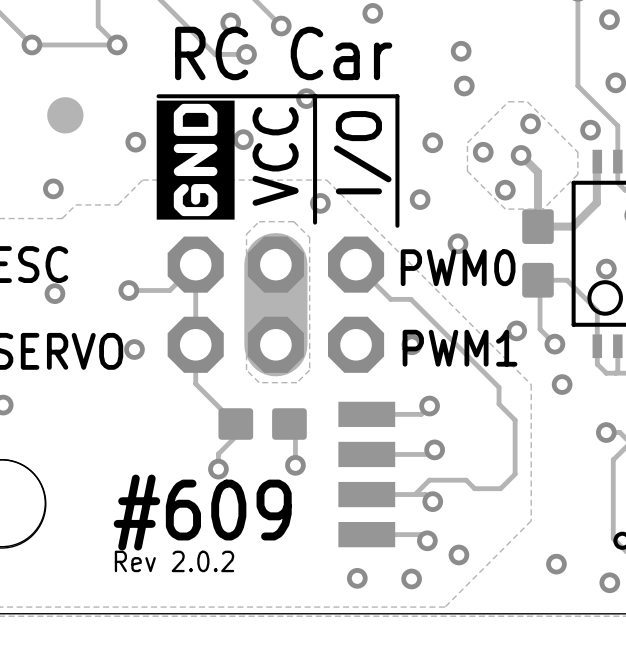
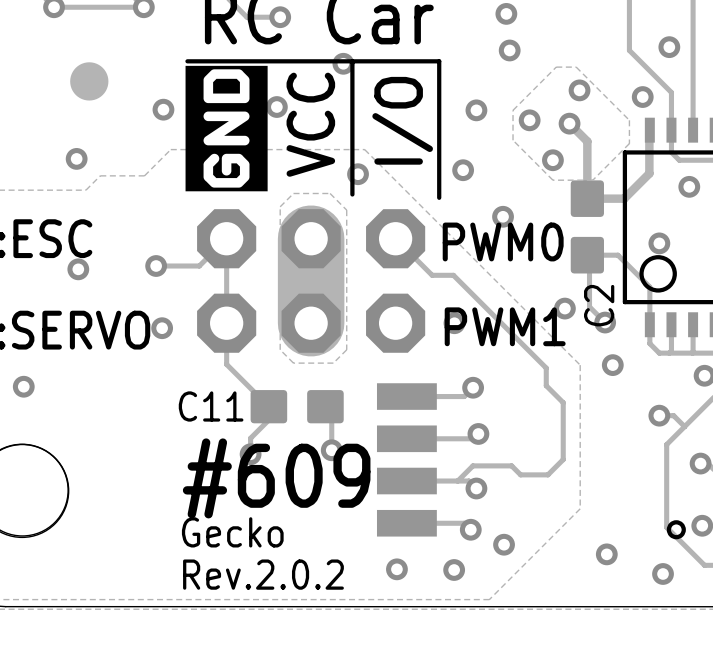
C2 name: none -> C2 (599, 305)
C11 name: none -> C11 (211, 406)
text position: #609 (202, 512) -> #609 (276, 478)
text: none -> Gecko (232, 532)
text: Rev 2.0.2 (174, 561) -> Rev.2.0.2 (263, 574)

